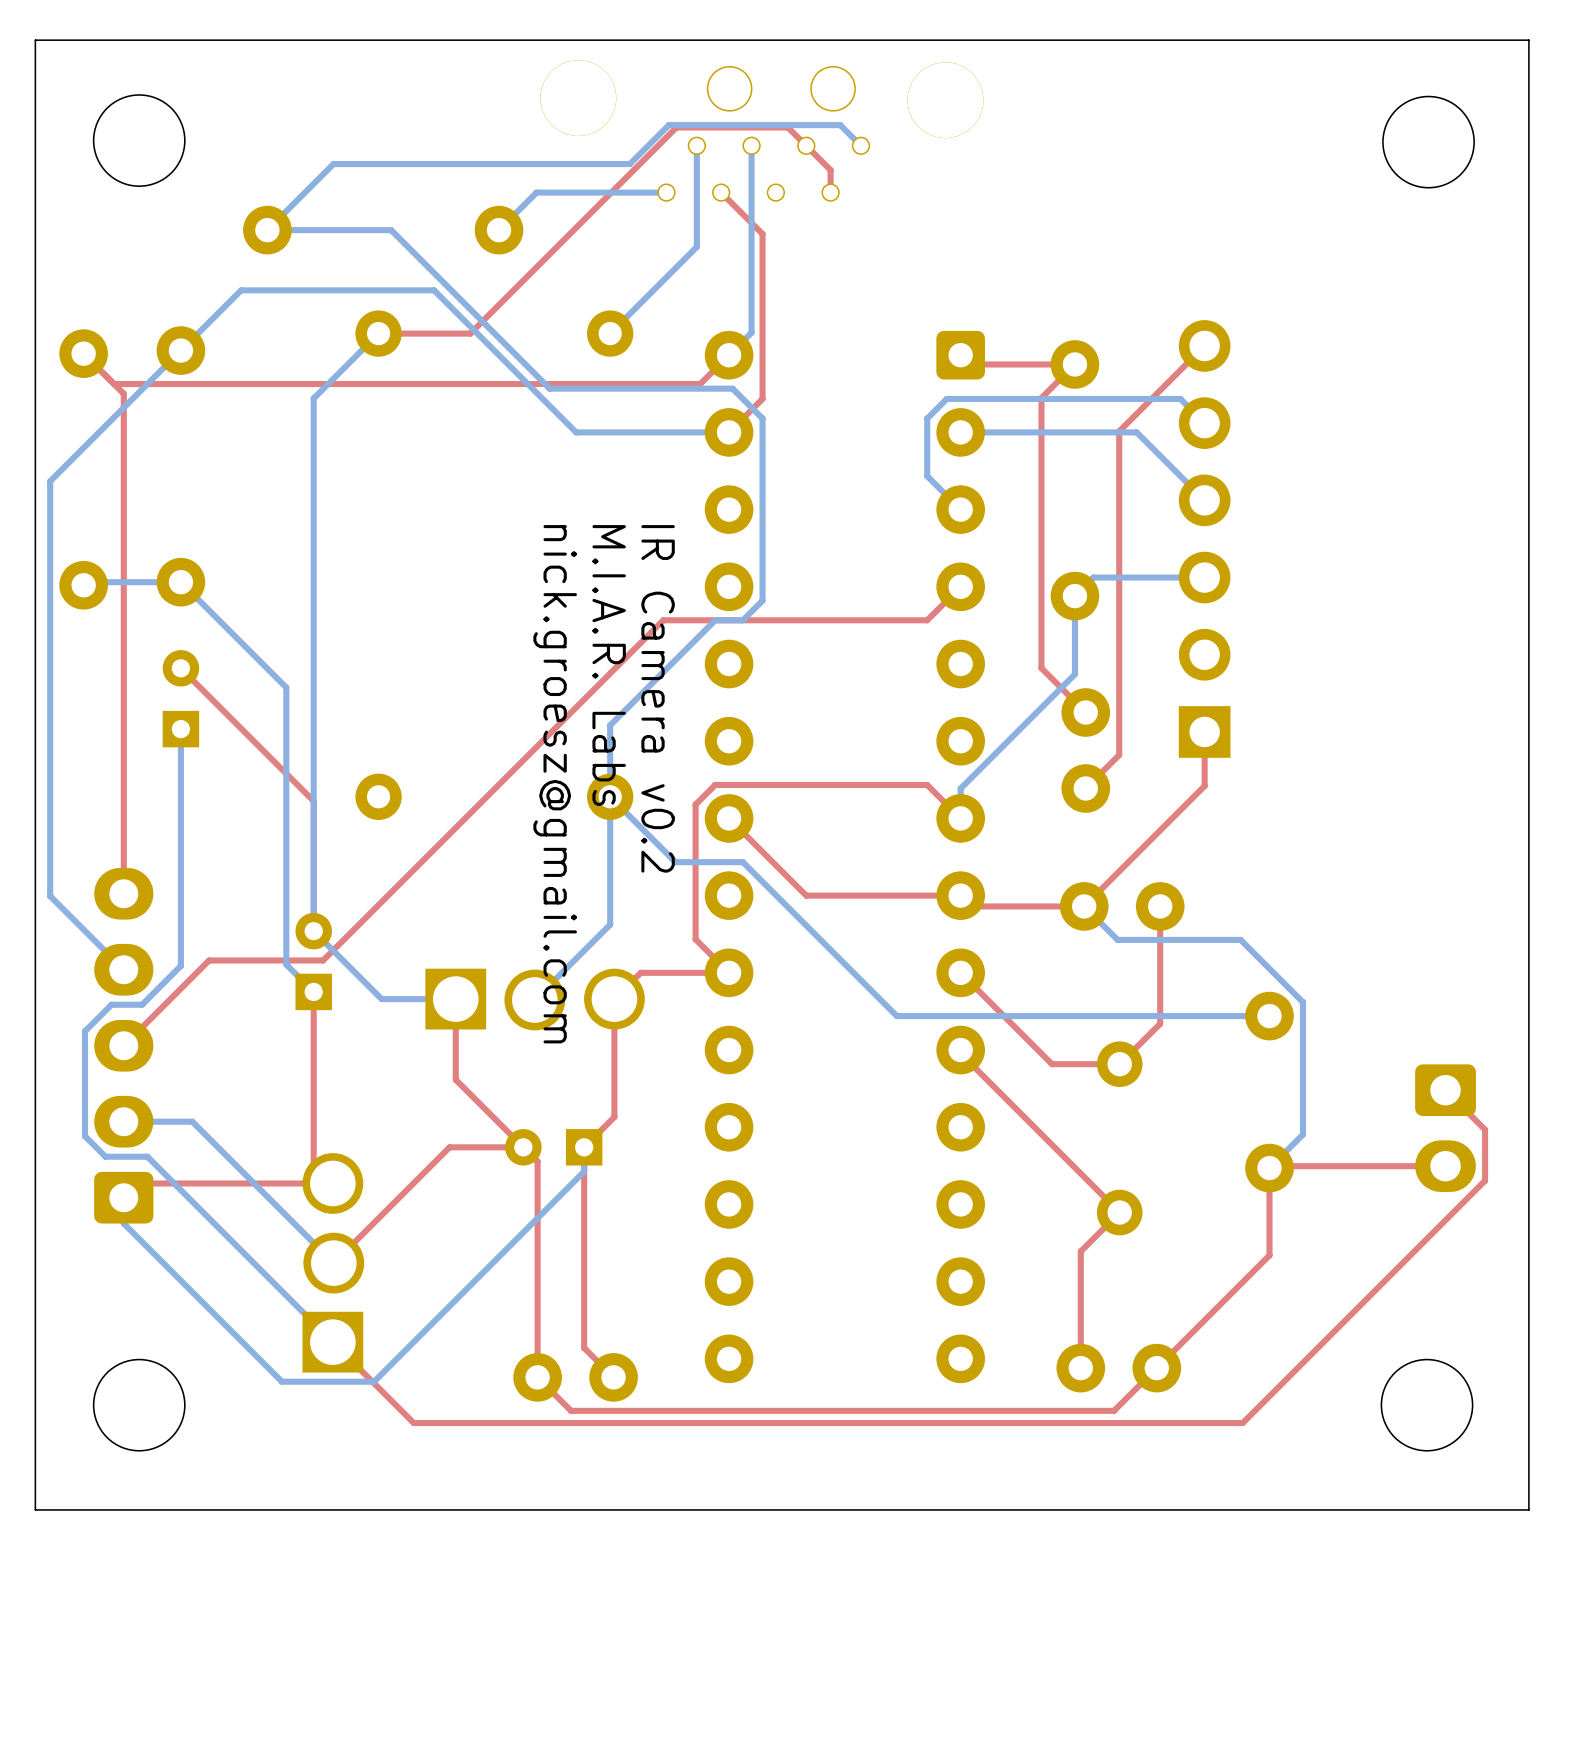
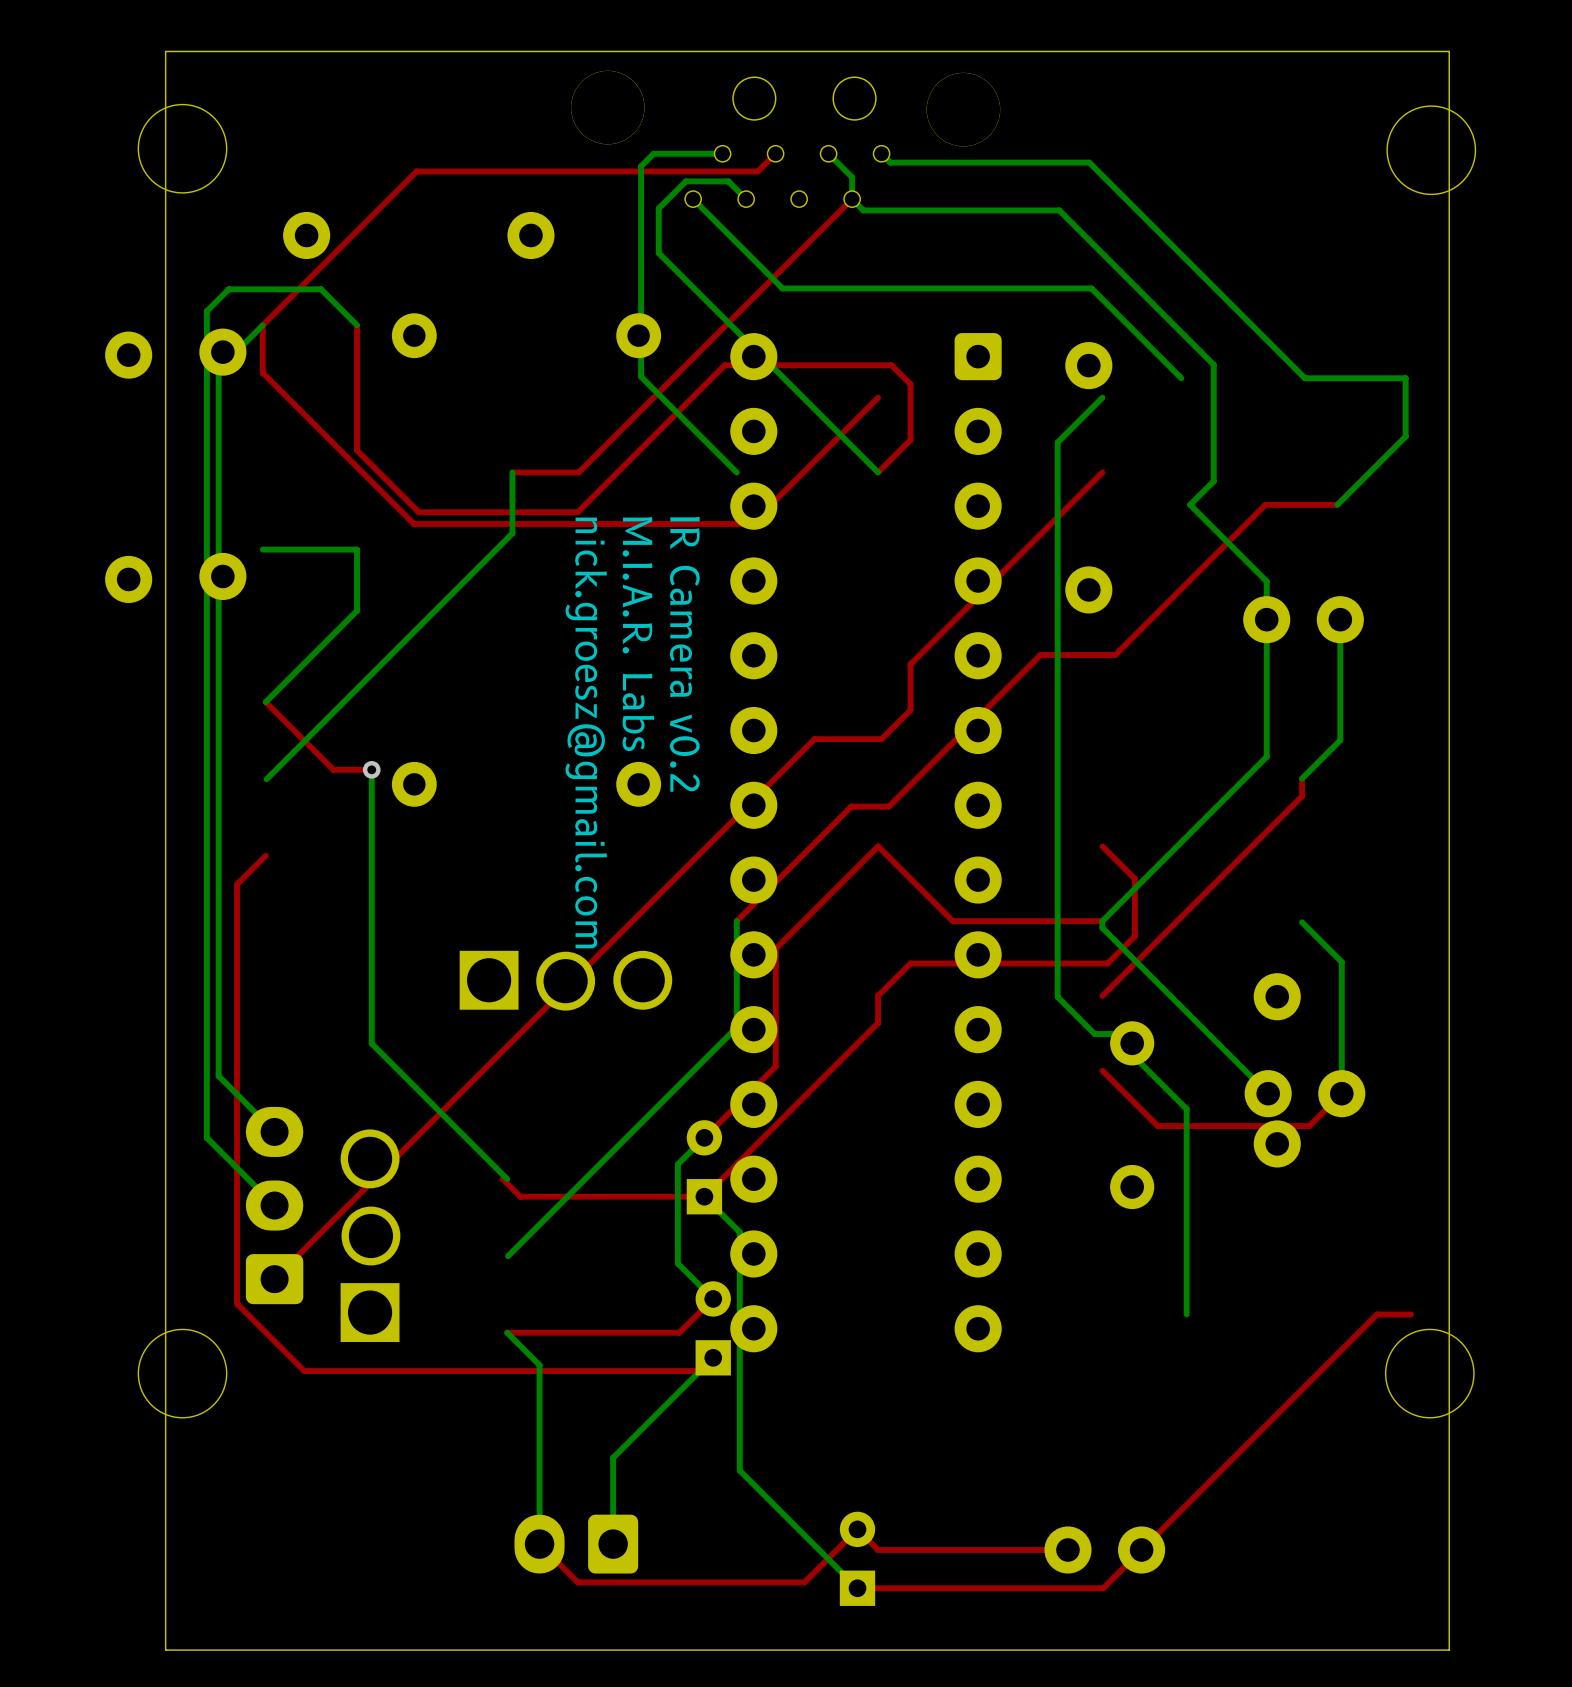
board edge: (1447, 40) (1528, 40) (1528, 1509) (35, 1509) (35, 40) (121, 40) -> (1449, 51) (1449, 1650) (165, 1650) (165, 51)
bottom track: (696, 145) (696, 246) (610, 333) -> (722, 153) (653, 153) (641, 166) (641, 376) (736, 472)
top track: none -> (775, 153) (757, 171) (416, 171) (262, 325) (262, 372) (413, 524) (751, 524) (878, 397)
bottom track: (751, 145) (751, 332) (729, 355) -> none
bottom track: none -> (828, 153) (852, 177) (852, 199) (863, 210) (1059, 210) (1213, 364) (1213, 481) (1190, 504) (1266, 581) (1266, 756) (1102, 921) (1102, 927) (1268, 1093)
bottom track: (860, 145) (840, 125) (668, 125) (629, 164) (333, 164) (267, 230) (391, 230) (549, 388) (732, 388) (762, 418) (762, 600) (742, 620) (715, 620) (610, 725) (610, 924) (534, 1000) -> (881, 153) (890, 162) (1089, 162) (1304, 378) (1405, 378) (1405, 436) (1337, 504)
bottom track: (666, 192) (536, 192) (499, 230) -> (693, 199) (782, 288) (1091, 288) (1181, 378)
top track: (721, 192) (762, 233) (762, 398) (729, 432) -> none
bottom track: none -> (746, 199) (728, 181) (685, 181) (658, 208) (658, 253) (878, 472)
top track: (830, 192) (830, 170) (788, 127) (676, 127) (470, 333) (378, 333) -> (852, 199) (578, 472) (512, 472)
bottom track: none -> (262, 325) (218, 369) (218, 1076) (274, 1131)
top track: none -> (357, 325) (357, 450) (418, 512) (577, 512) (724, 365) (891, 365) (910, 384) (910, 440) (878, 472)
bottom track: none -> (357, 325) (321, 289) (228, 289) (206, 311) (206, 1137) (274, 1205)
bottom track: (378, 333) (313, 398) (313, 931) (381, 999) (455, 999) -> none
top track: (1204, 345) (1119, 431) (1119, 755) (1085, 788) -> none
top track: (83, 353) (123, 393) (123, 893) -> none
top track: (729, 355) (700, 384) (114, 384) -> none
top track: (960, 355) (969, 364) (1074, 364) (1041, 397) (1041, 668) (1085, 712) -> none
bottom track: none -> (1102, 397) (1057, 442) (1057, 997) (1094, 1034) (1111, 1034) (1186, 1109) (1186, 1314)
bottom track: (1204, 423) (1180, 398) (946, 398) (927, 418) (927, 476) (960, 509) -> none
bottom track: (729, 432) (576, 432) (434, 290) (241, 290) (50, 481) (50, 896) (123, 969) -> none
bottom track: (960, 432) (1136, 432) (1204, 500) -> none
bottom track: none -> (512, 472) (512, 533) (266, 779)
top track: none -> (1102, 472) (910, 664) (910, 710) (881, 739) (814, 739) (274, 1279)
top track: none -> (1337, 504) (1265, 504) (1115, 655) (1040, 655) (888, 806) (851, 806) (736, 921)
part: (1204, 538) -> none
bottom track: none -> (262, 549) (357, 549) (357, 610) (265, 702)
bottom track: (1204, 577) (1093, 577) (1074, 596) (1074, 674) (960, 788) (960, 818) -> none
bottom track: (83, 585) (86, 582) (180, 582) (286, 687) (286, 964) (313, 991) -> none
top track: (960, 586) (927, 620) (663, 620) (323, 960) (209, 960) (123, 1045) -> none
part: none -> (1303, 619)
bottom track: none -> (1340, 619) (1340, 740) (1302, 778)
top track: (180, 668) (313, 801) (313, 931) -> none
part: (180, 698) -> none
top track: none -> (265, 702) (333, 769) (371, 769)
bottom track: (180, 729) (180, 965) (142, 1004) (111, 1004) (85, 1031) (85, 1136) (105, 1156) (147, 1156) (332, 1342) -> none
top track: (1204, 731) (1204, 786) (1084, 906) (971, 906) (960, 895) (806, 895) (729, 818) -> none
part: (1085, 750) -> none
bottom track: none -> (371, 769) (371, 1043) (507, 1179)
via: none -> (371, 769)
top track: none -> (1302, 778) (1302, 796) (1102, 995)
bottom track: (610, 796) (675, 862) (742, 862) (896, 1016) (1269, 1016) -> none
top track: (960, 818) (927, 784) (715, 784) (695, 804) (695, 939) (729, 972) (640, 972) (614, 999) (614, 1117) (584, 1147) (584, 1347) (613, 1377) -> none
top track: none -> (1102, 846) (1134, 878) (1134, 936) (1107, 963) (910, 963) (878, 995) (878, 1023) (704, 1196) (520, 1196) (502, 1179) (507, 1179)
top track: none -> (265, 855) (237, 884) (237, 1303) (304, 1371) (700, 1371) (713, 1357)
bottom track: (1084, 906) (1117, 939) (1240, 939) (1302, 1002) (1302, 1134) (1269, 1168) -> none
part: (1122, 906) -> none
top track: (1160, 906) (1160, 1023) (1119, 1064) (1052, 1064) (960, 972) -> none
bottom track: none -> (736, 921) (736, 1027) (508, 1256)
top track: none -> (1102, 921) (952, 921) (878, 846) (775, 948) (775, 1066) (704, 1137)
bottom track: none -> (1302, 922) (1341, 962) (1341, 1093)
part: (313, 961) -> none
top track: (313, 991) (313, 1164) (332, 1183) (138, 1183) (123, 1197) -> none
top track: (455, 999) (455, 1079) (537, 1161) (537, 1377) (571, 1410) (1114, 1410) (1269, 1255) (1269, 1168) (1271, 1166) (1445, 1166) -> none
part: (123, 1045) -> none
top track: (960, 1050) (960, 1053) (1119, 1212) (1080, 1251) (1080, 1368) -> none
top track: (1445, 1090) (1485, 1129) (1485, 1180) (1242, 1423) (413, 1423) (332, 1342) -> none
top track: none -> (1102, 1070) (1157, 1126) (1309, 1126) (1341, 1093)
part: none -> (1304, 1093)
bottom track: (123, 1121) (192, 1121) (333, 1263) -> none
part: (1445, 1128) -> none
top track: (523, 1147) (449, 1147) (333, 1263) -> none
part: (553, 1147) -> none
bottom track: (584, 1147) (584, 1171) (374, 1381) (281, 1381) (123, 1223) (123, 1197) -> none
bottom track: none -> (704, 1137) (677, 1164) (677, 1263) (713, 1298)
part: none -> (704, 1167)
bottom track: none -> (704, 1196) (739, 1232) (739, 1470) (857, 1588)
part: none -> (274, 1205)
top track: none -> (713, 1298) (679, 1332) (507, 1332)
top track: none -> (1410, 1314) (1377, 1314) (1103, 1588) (857, 1588)
part: none -> (713, 1328)
bottom track: none -> (507, 1332) (539, 1365) (539, 1544)
part: (1118, 1368) -> none
part: (575, 1377) -> none
bottom track: none -> (713, 1357) (613, 1457) (613, 1544)
top track: none -> (539, 1544) (577, 1582) (804, 1582) (857, 1529) (878, 1549) (1068, 1549)
part: none -> (576, 1544)
part: none -> (1104, 1549)
part: none -> (857, 1558)

